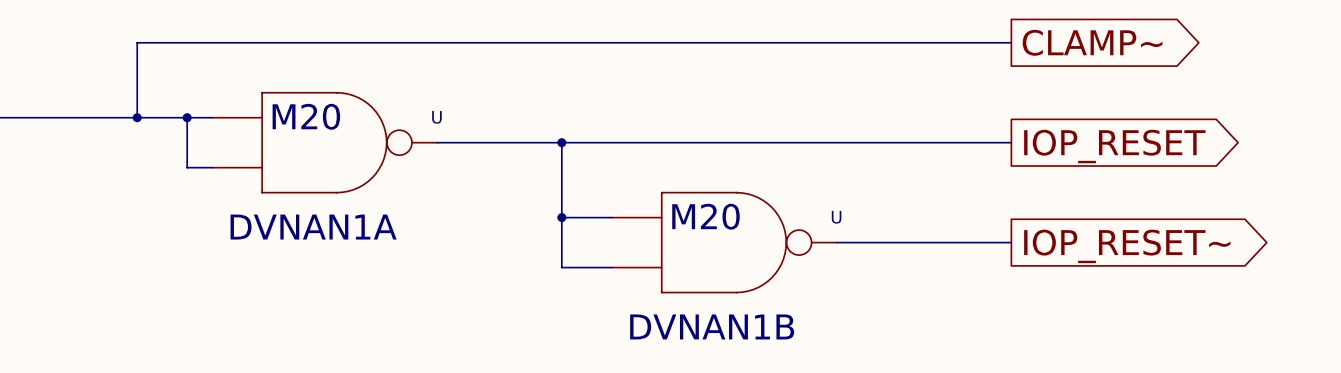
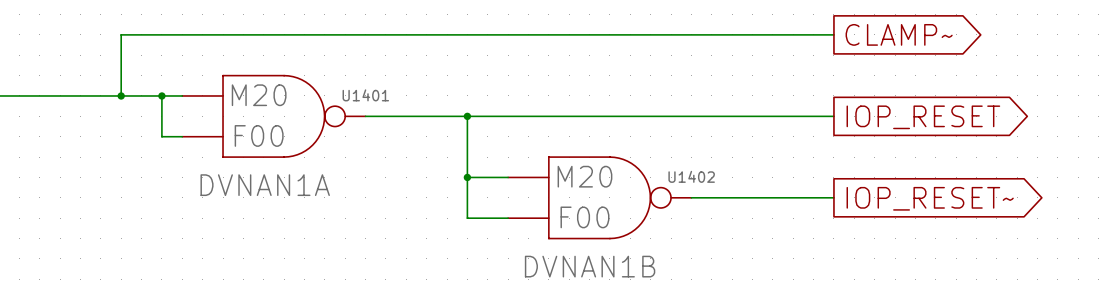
U name: U (436, 117) -> U1401 (365, 95)
U value: none -> F00 (259, 135)
U name: U (836, 217) -> U1402 (691, 176)
U value: none -> F00 (584, 217)

